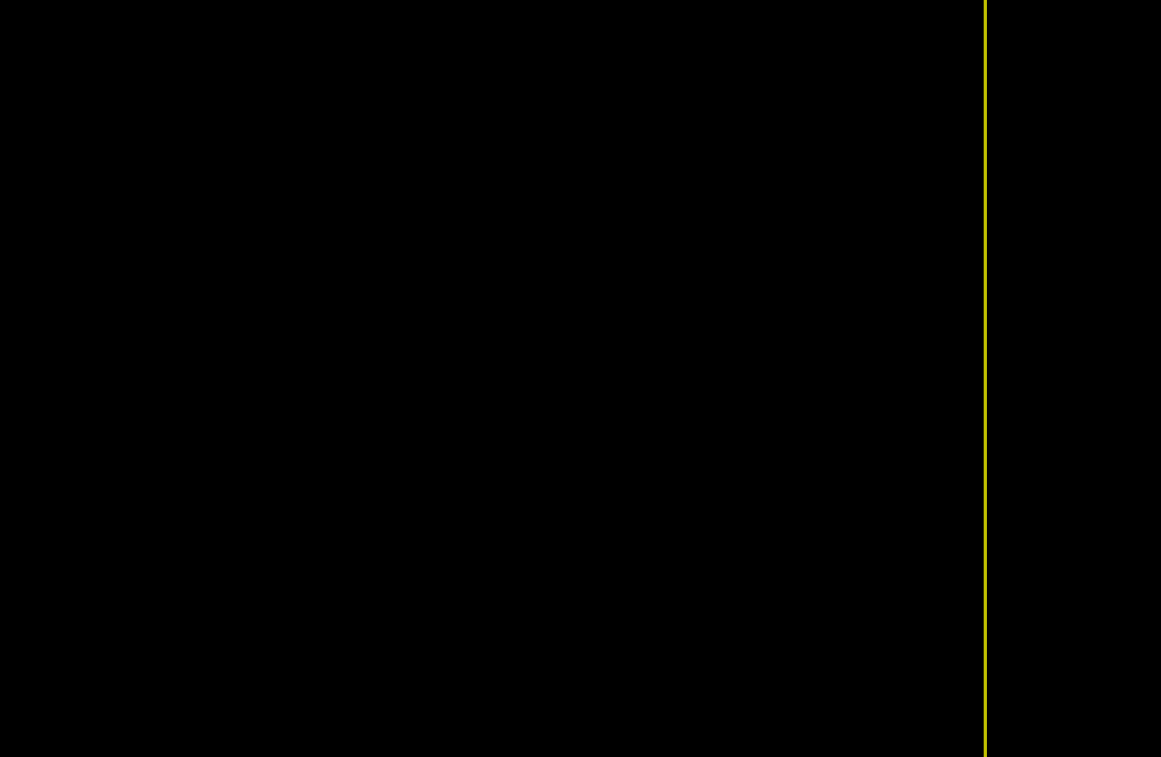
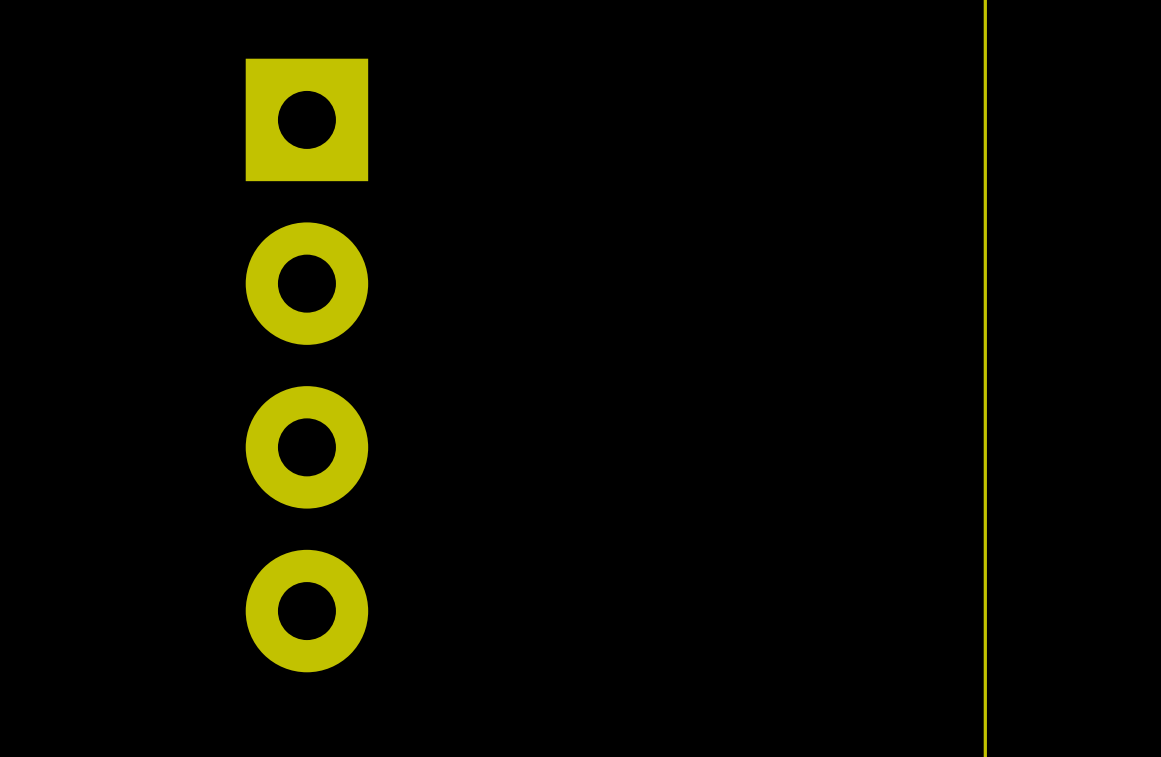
part: none -> (306, 365)

